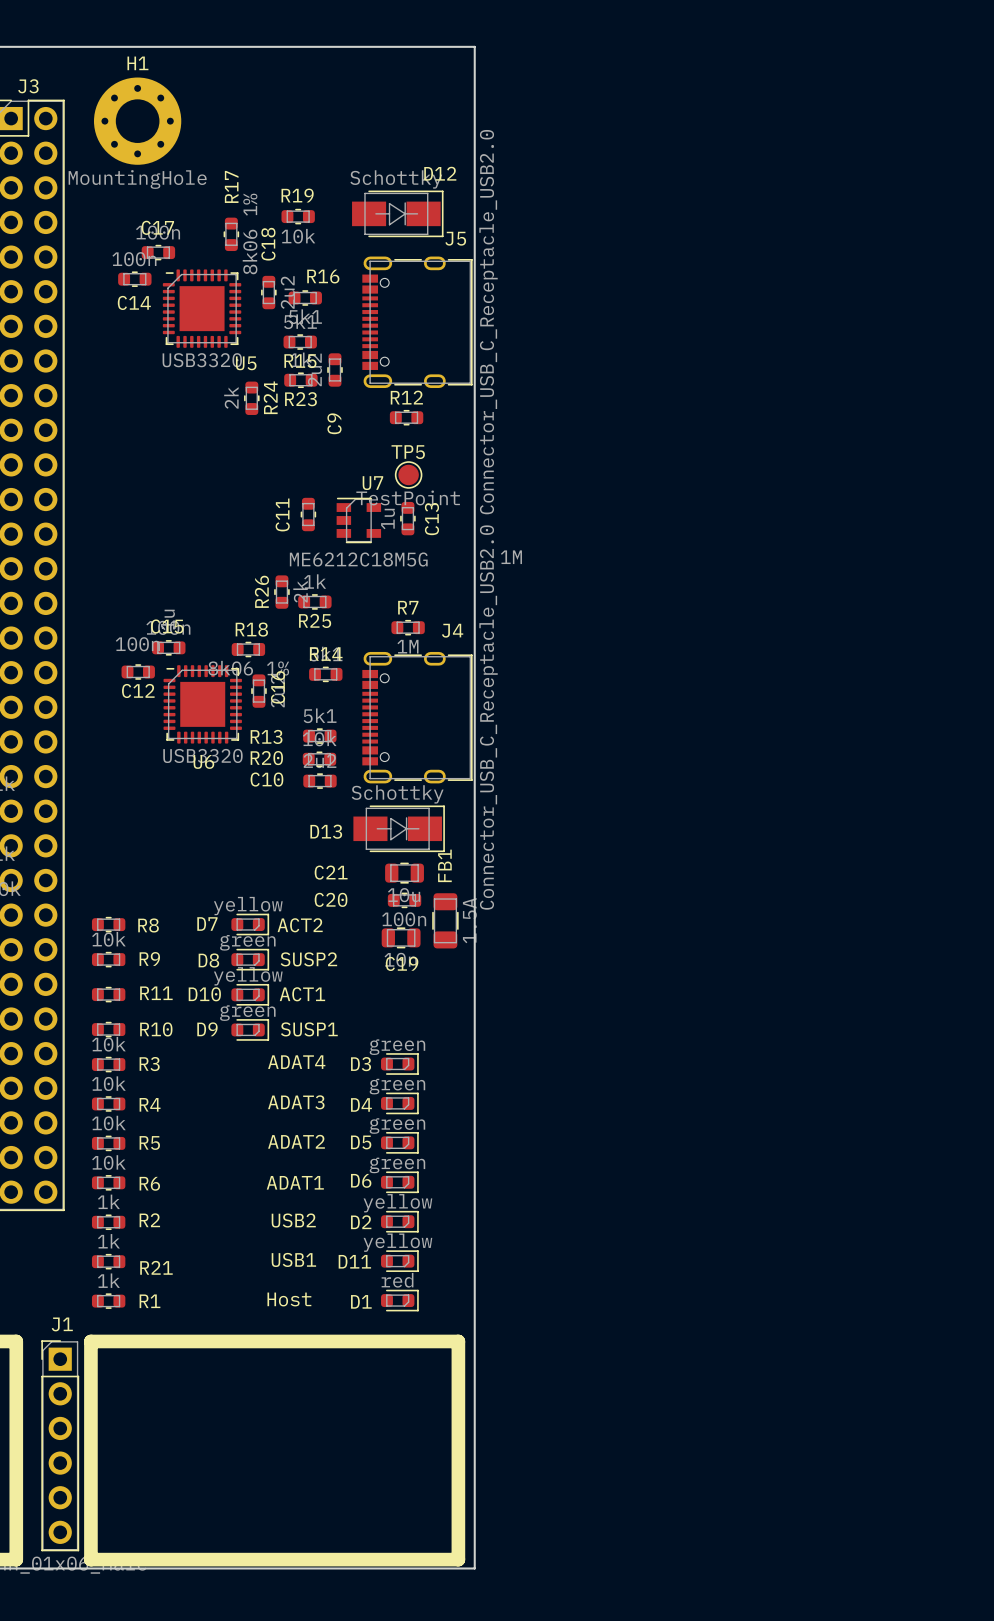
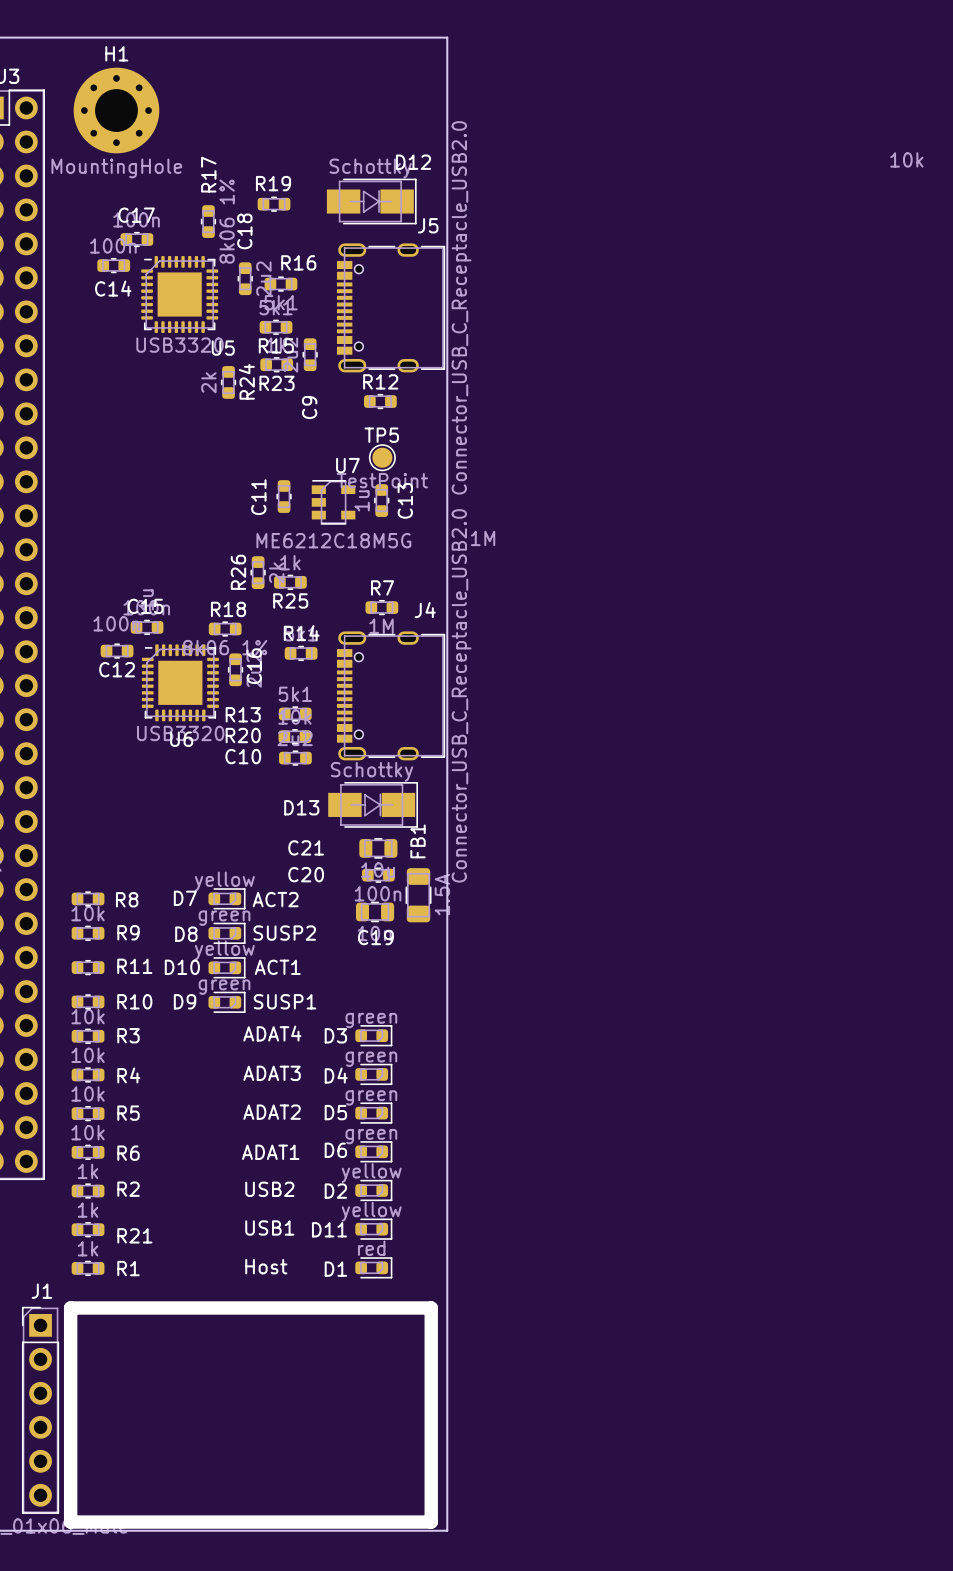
R19 value position: 10k (298, 236) -> 10k (906, 159)

